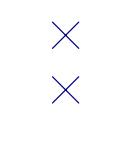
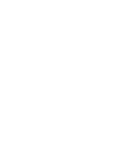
no-connect mark: (65, 35) -> none
no-connect mark: (65, 89) -> none

